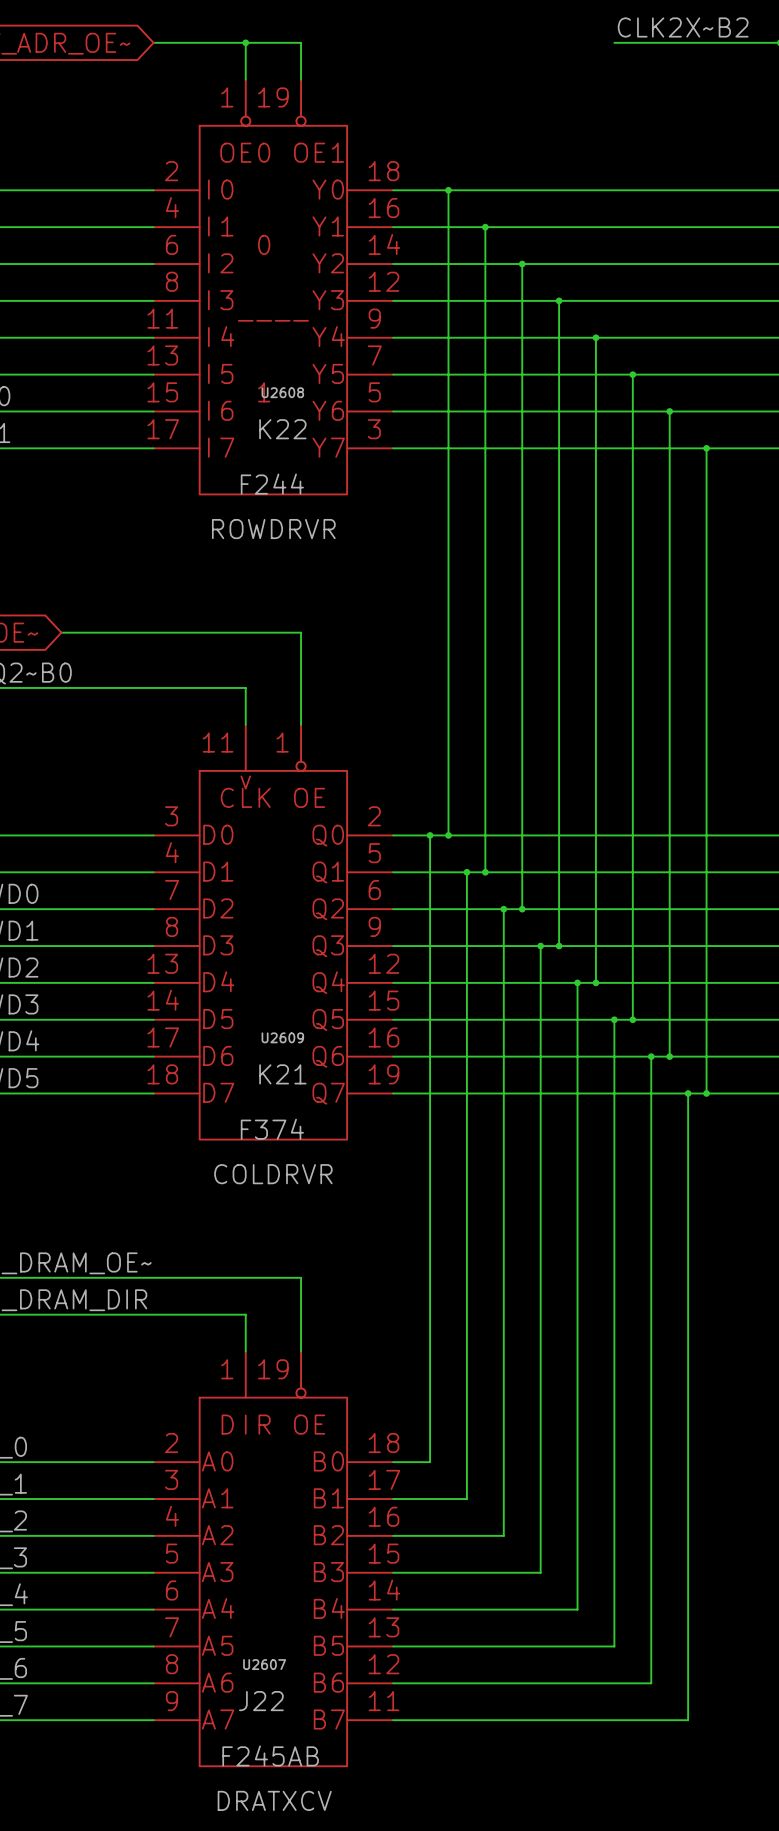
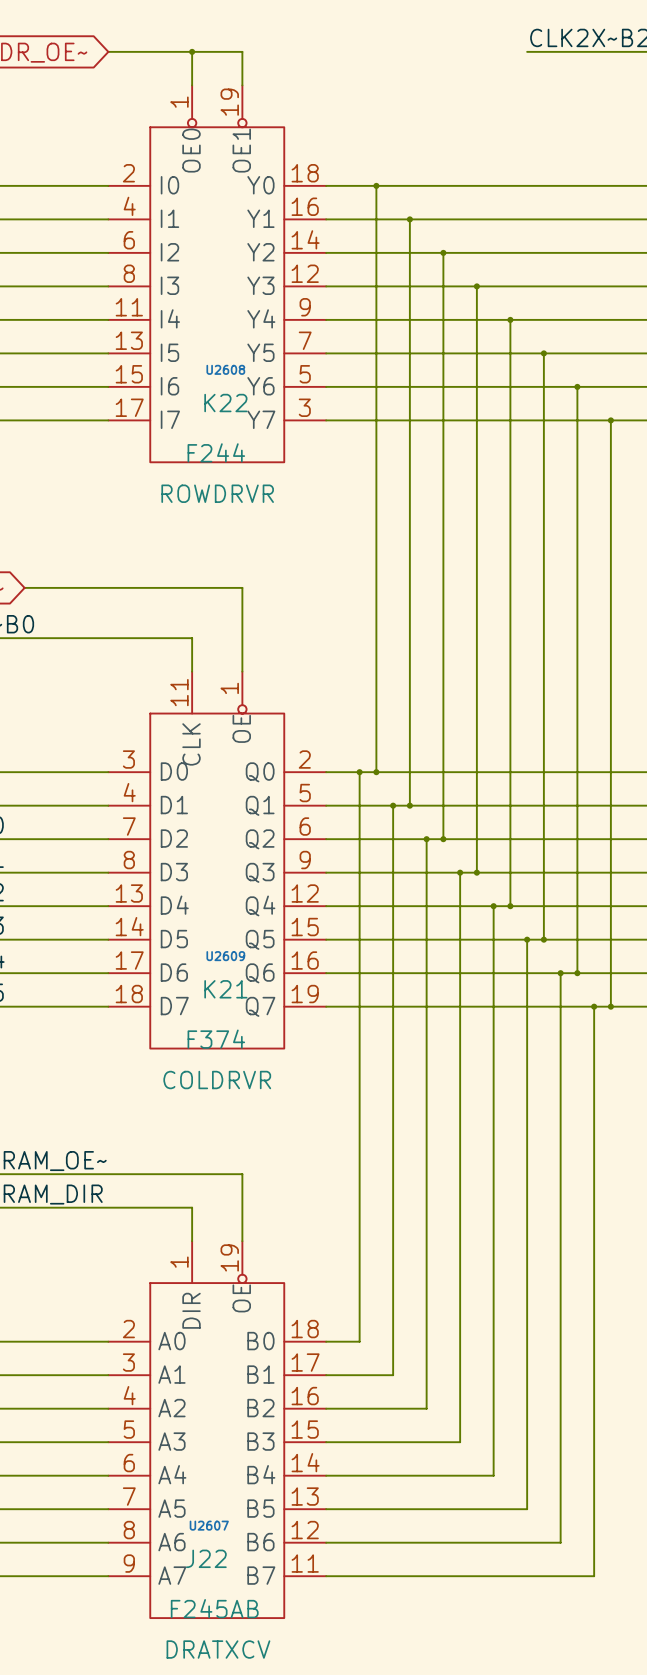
U2608 symbol: [153, 79, 394, 495] -> [108, 85, 327, 463]
U2609 symbol: [153, 724, 394, 1140] -> [108, 671, 327, 1049]
U2607 symbol: [153, 1351, 394, 1767] -> [108, 1241, 327, 1619]

